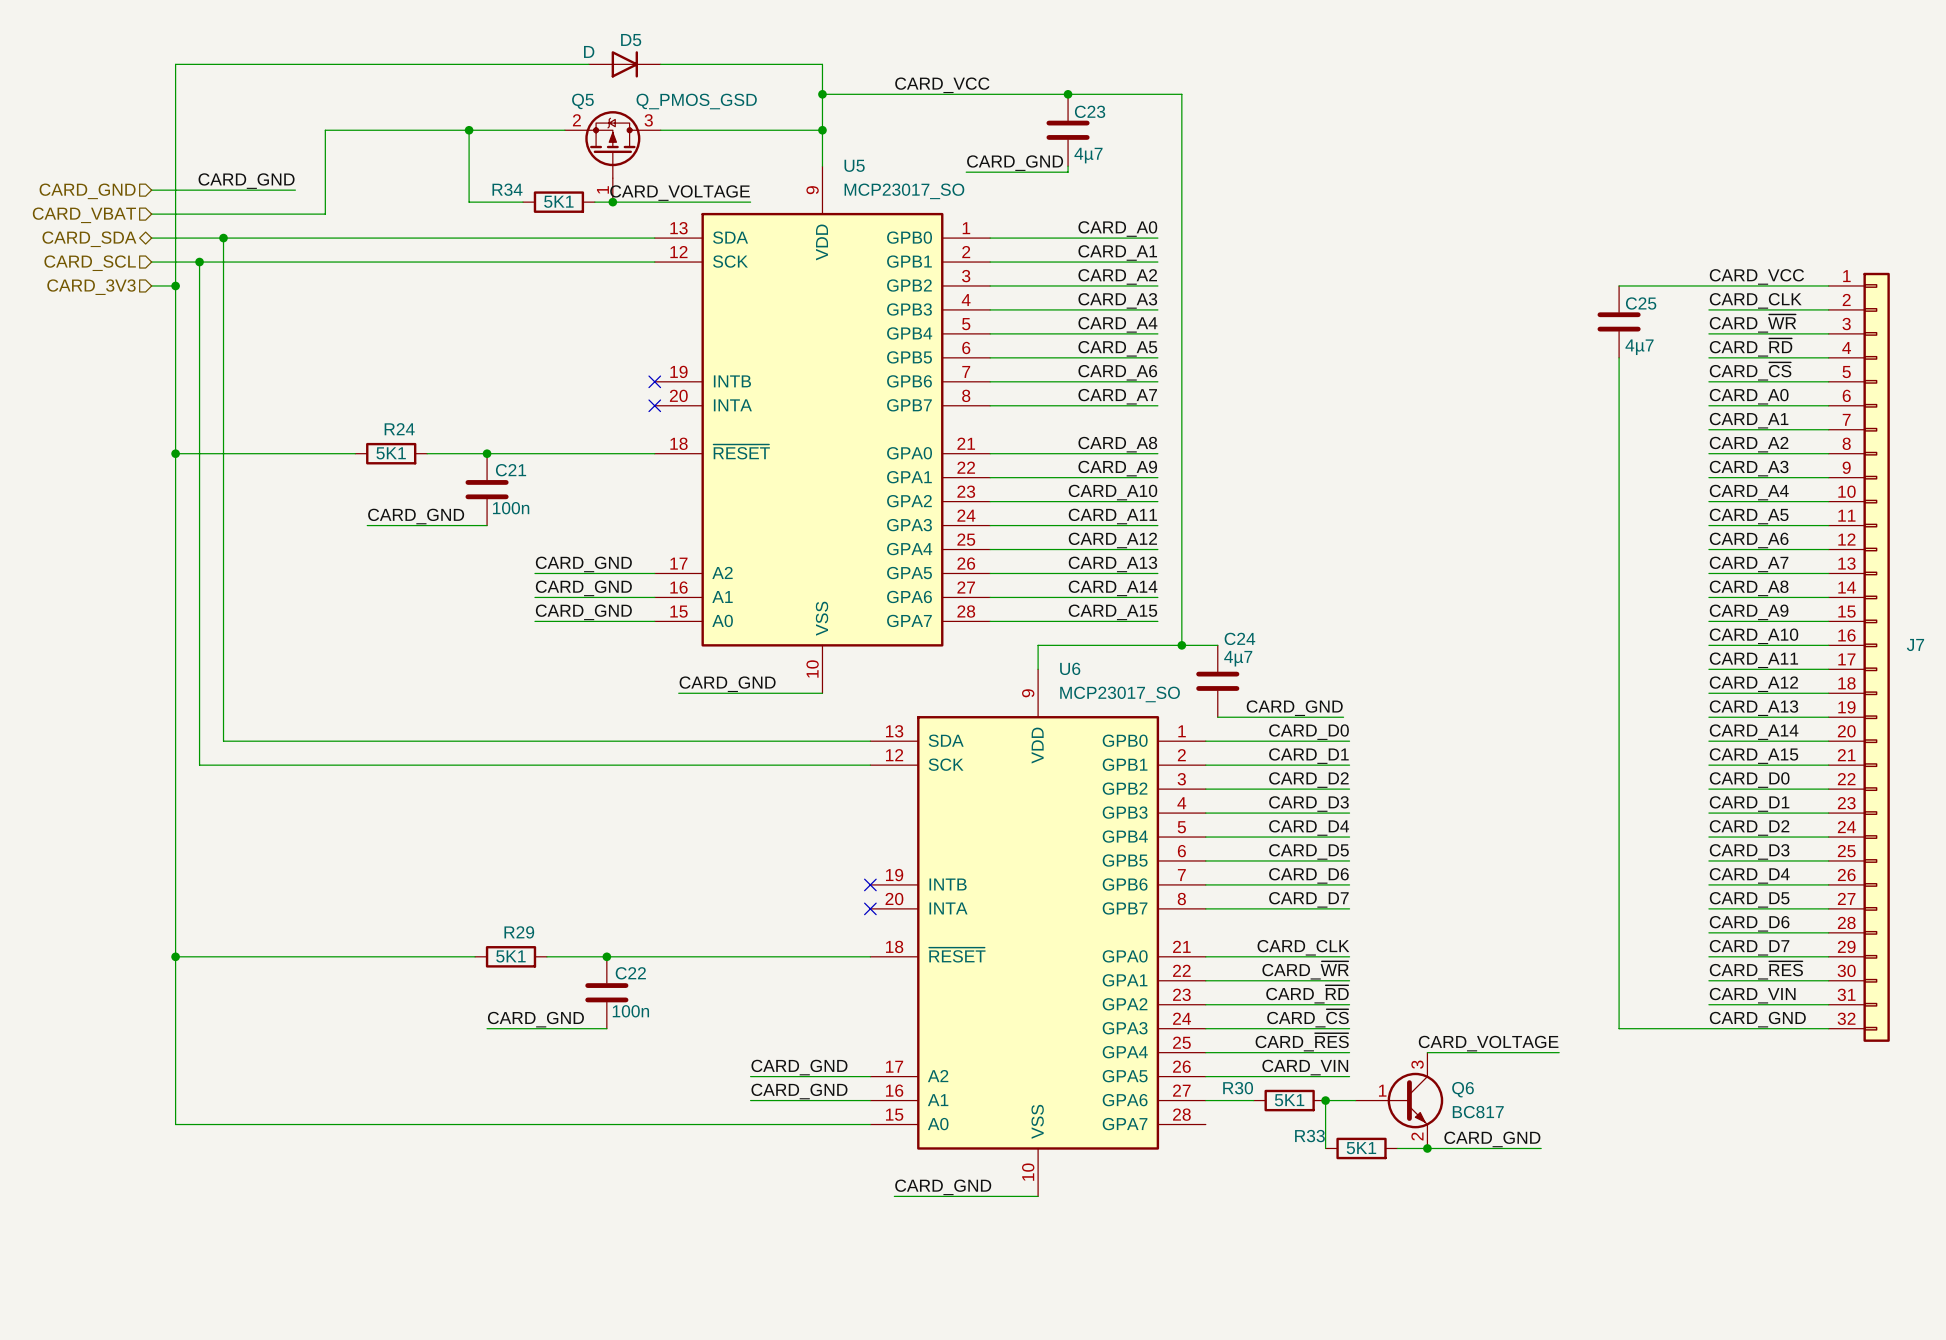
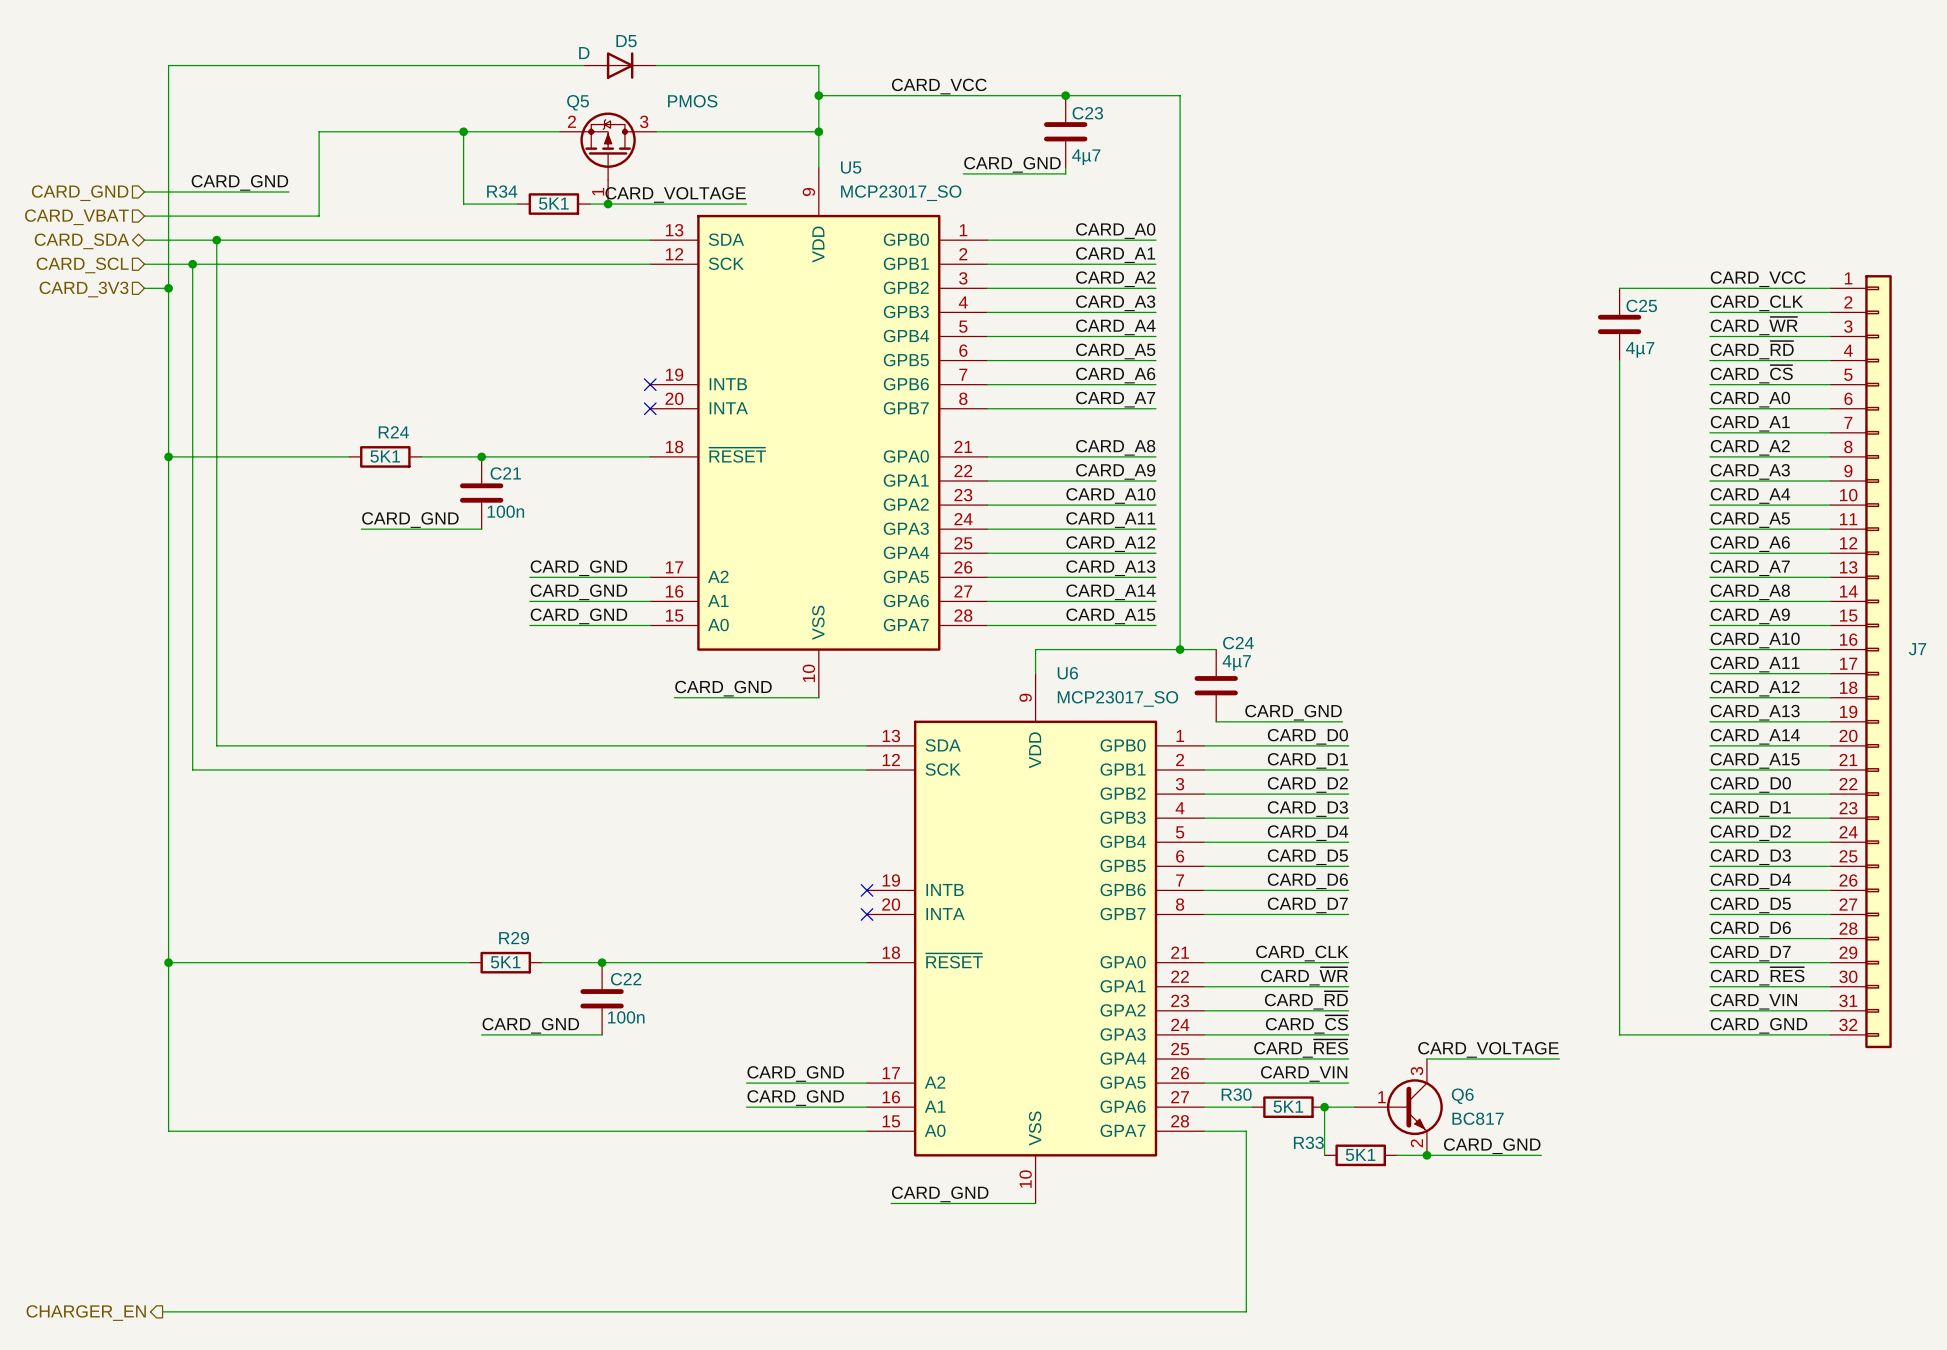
Q5 value: Q_PMOS_GSD (696, 101) -> PMOS (692, 101)
wire: none -> (1204, 1131) (1246, 1131) (1246, 1311) (162, 1311)
hierarchical label: none -> CHARGER_EN (86, 1313)

